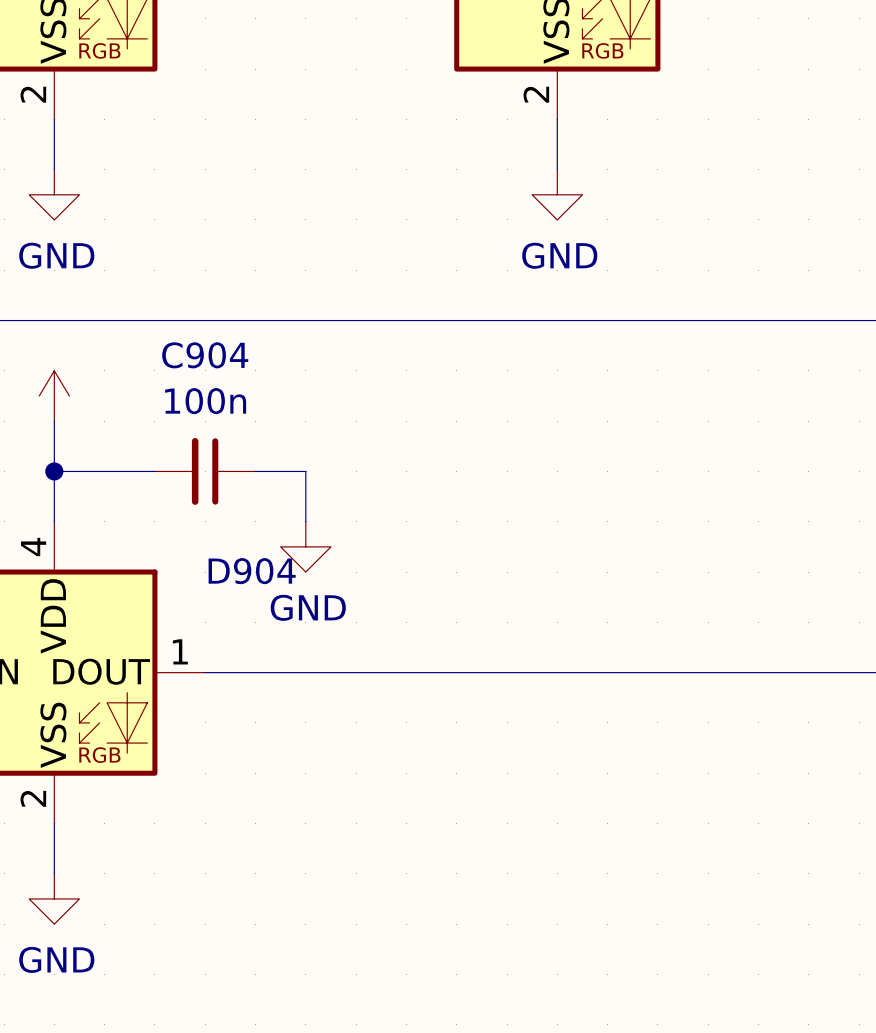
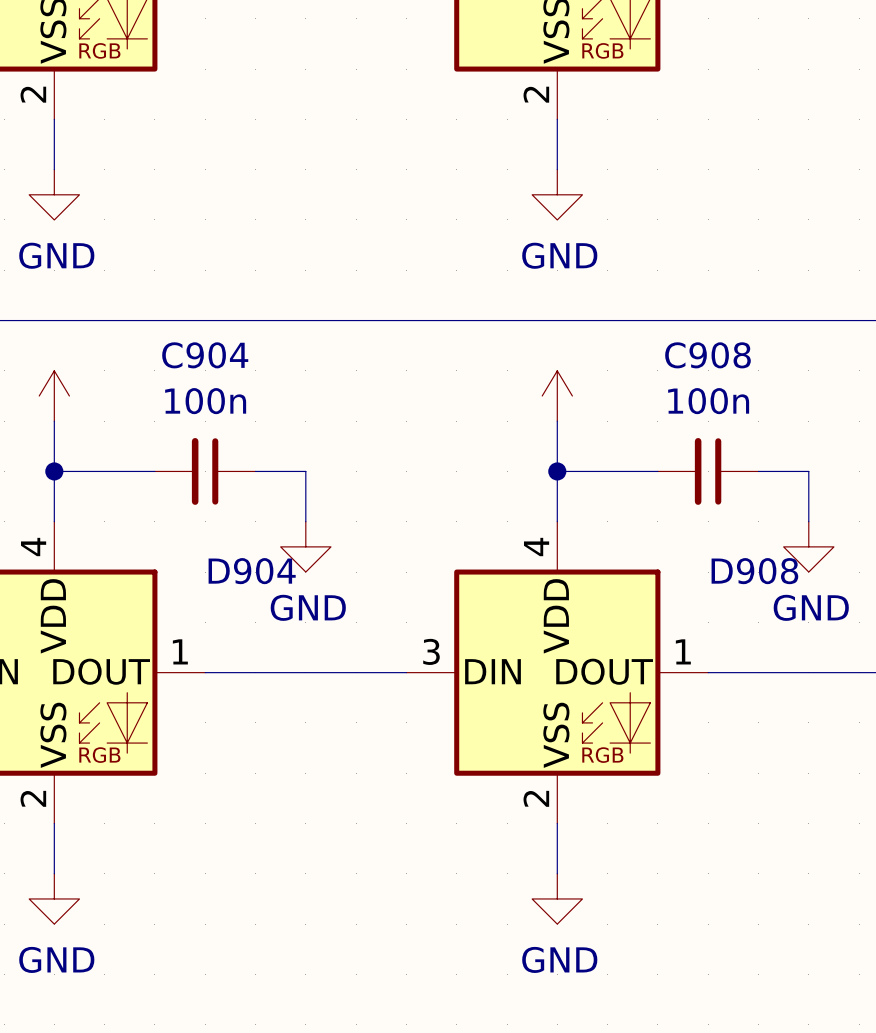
power symbol: none -> (557, 396)
wire: none -> (557, 421) (557, 521)
wire: none -> (557, 471) (657, 471)
junction: none -> (557, 471)
C908: none -> 100n (708, 471)
wire: none -> (758, 471) (808, 471) (808, 521)
power symbol: none -> GND (808, 546)
D908: none -> (557, 672)
wire: none -> (557, 823) (557, 873)
power symbol: none -> GND (557, 898)

